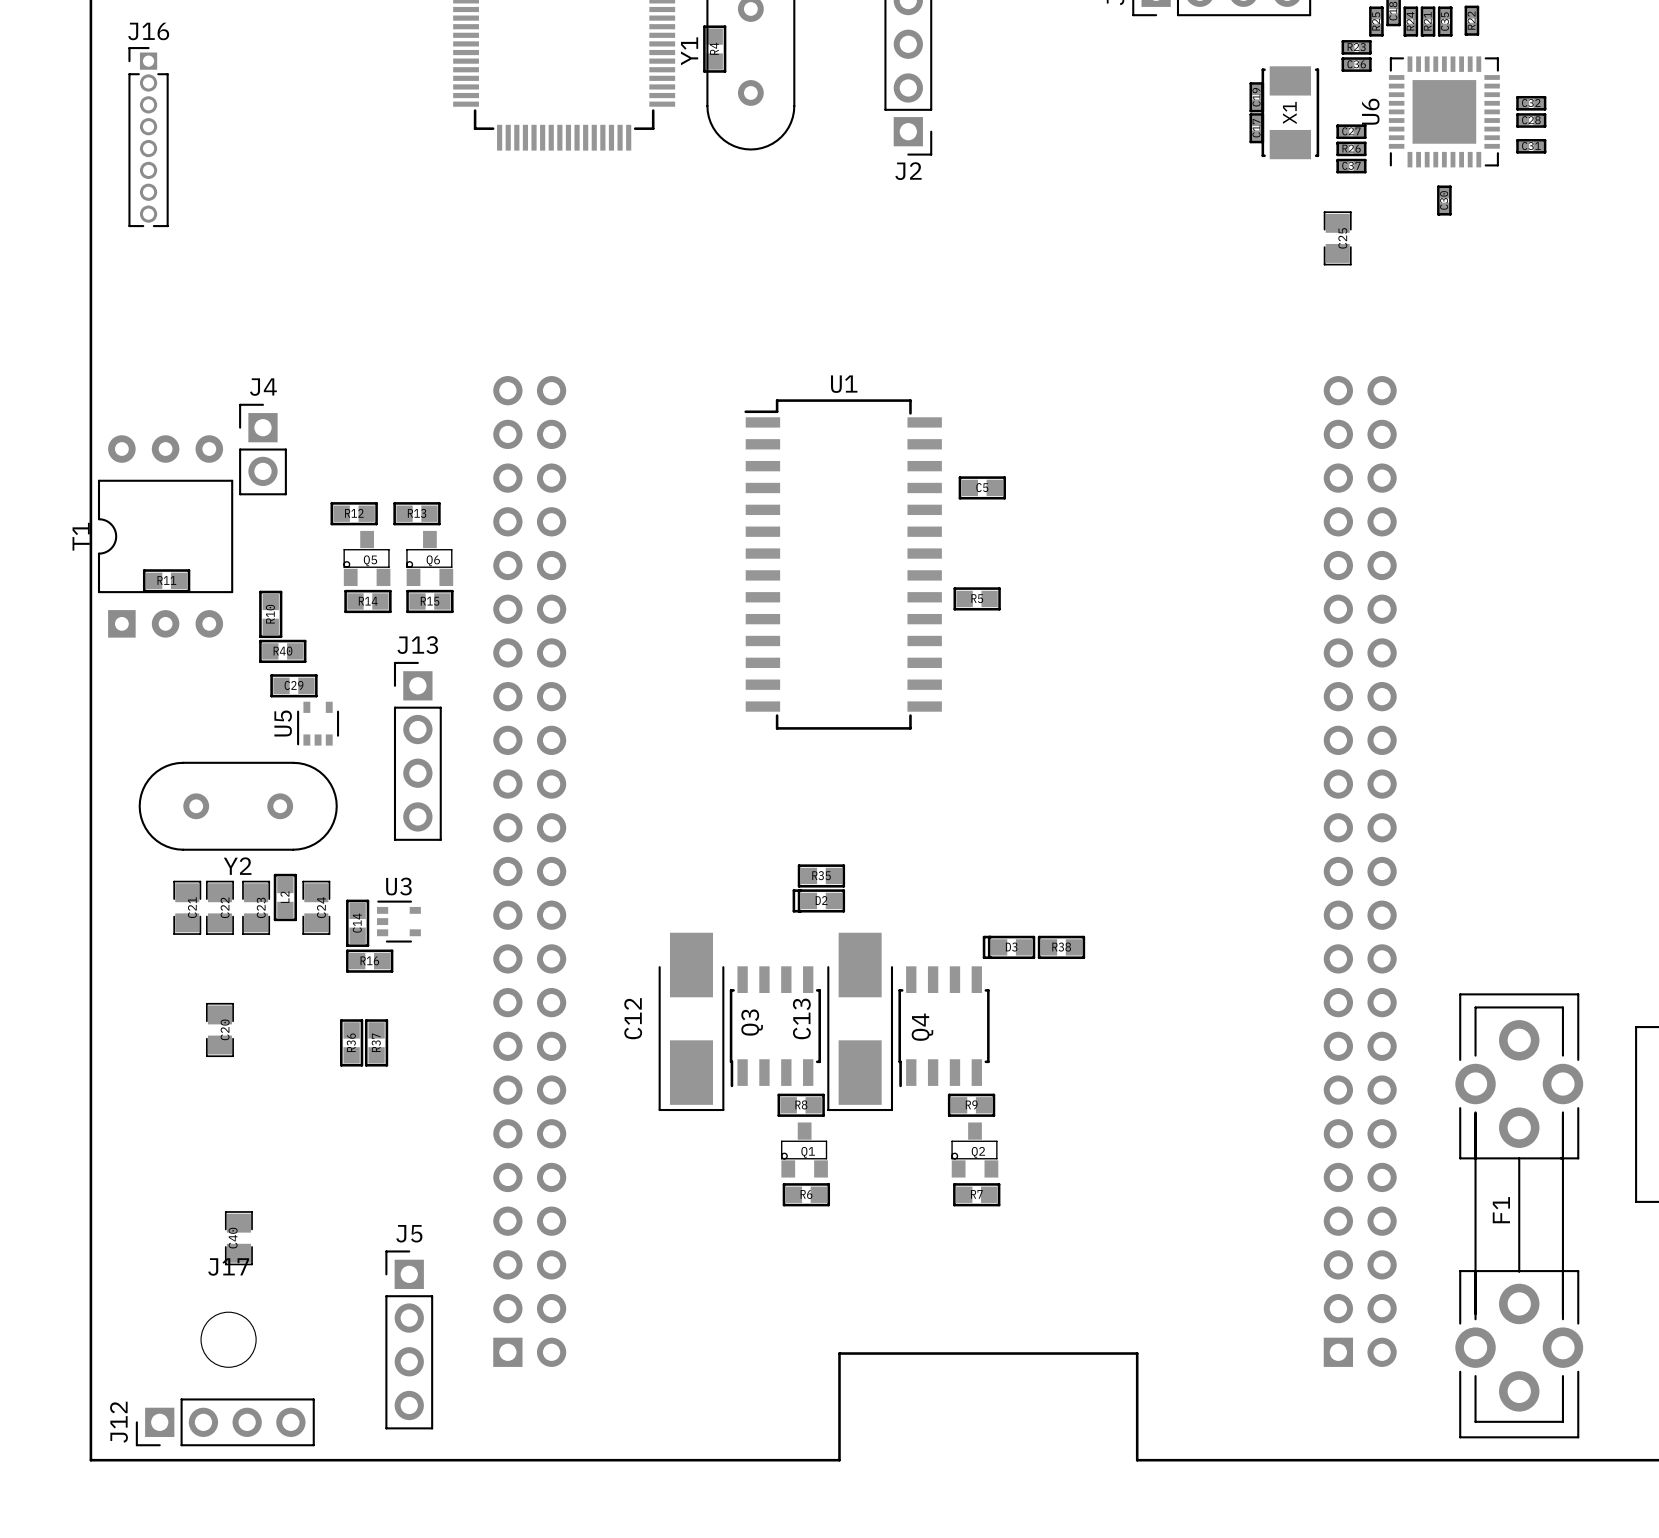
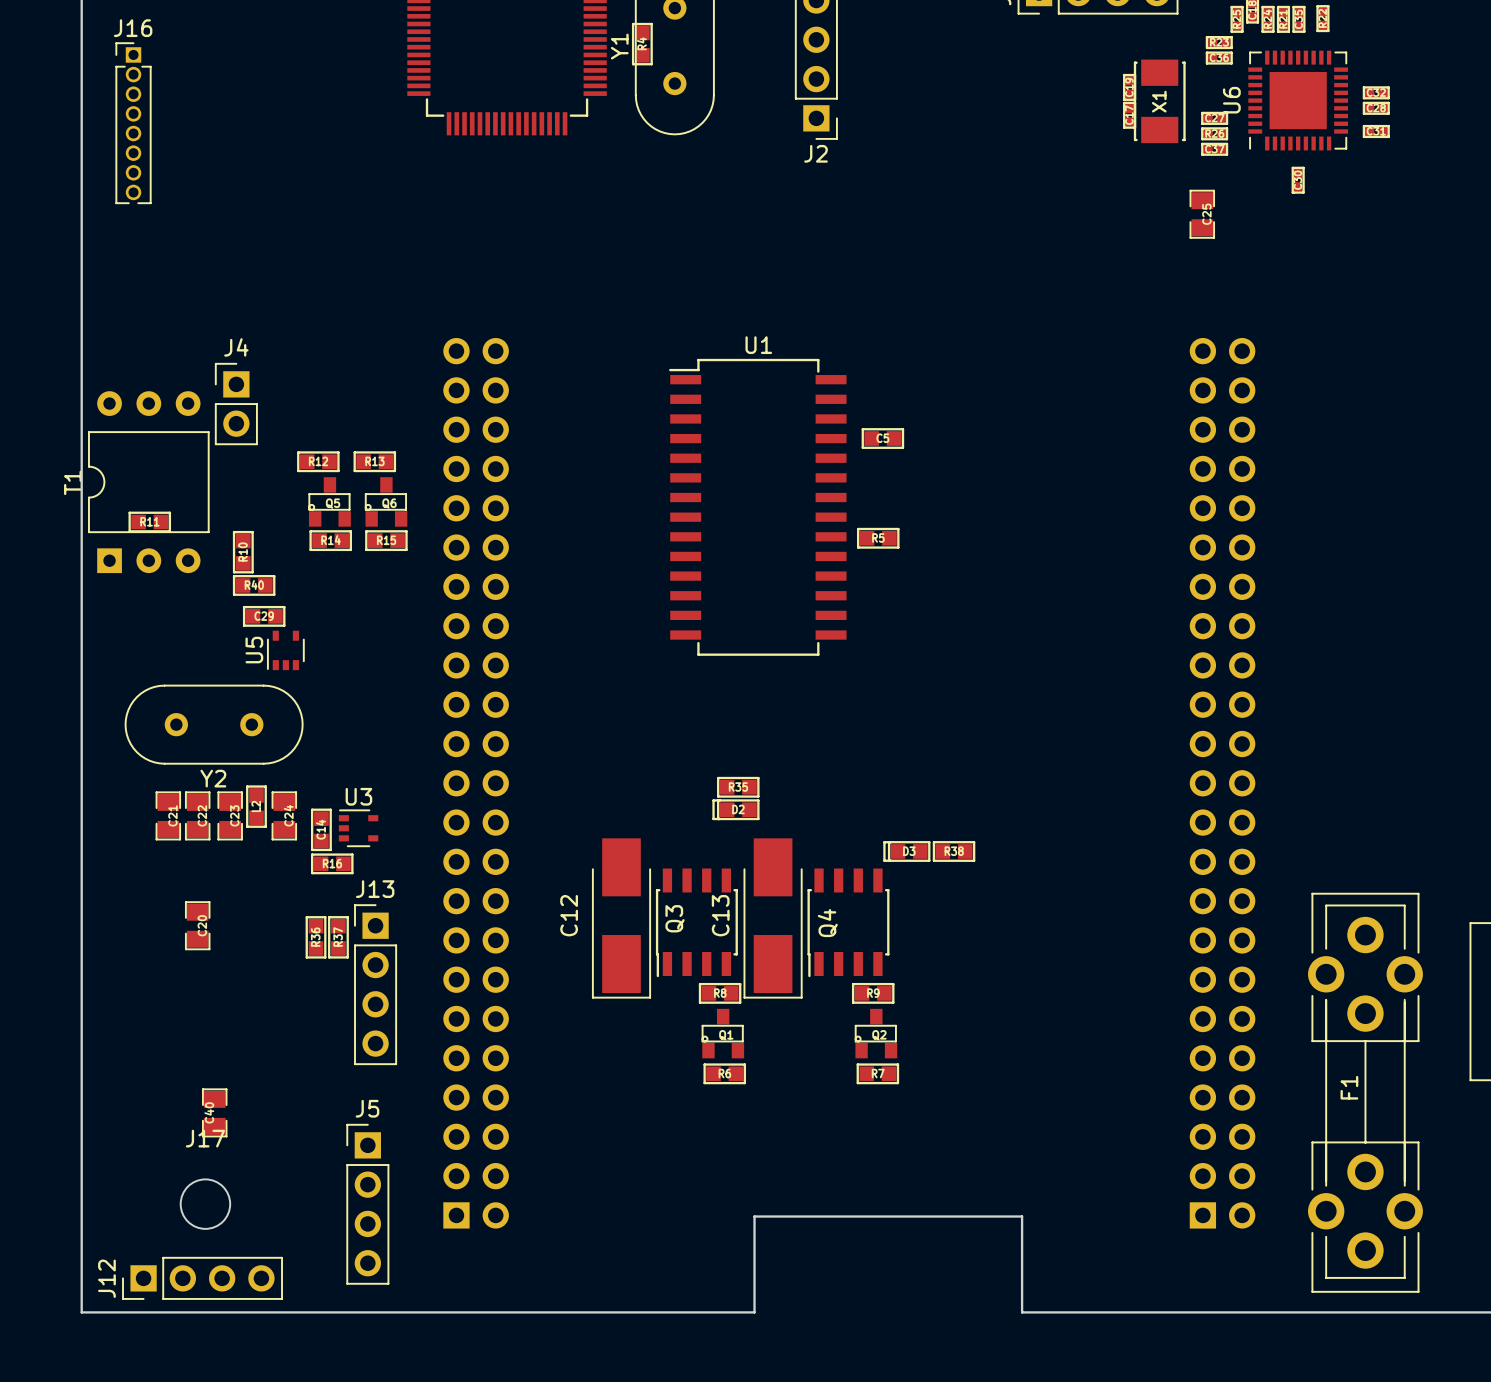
J13 position: (417, 751) -> (375, 984)

